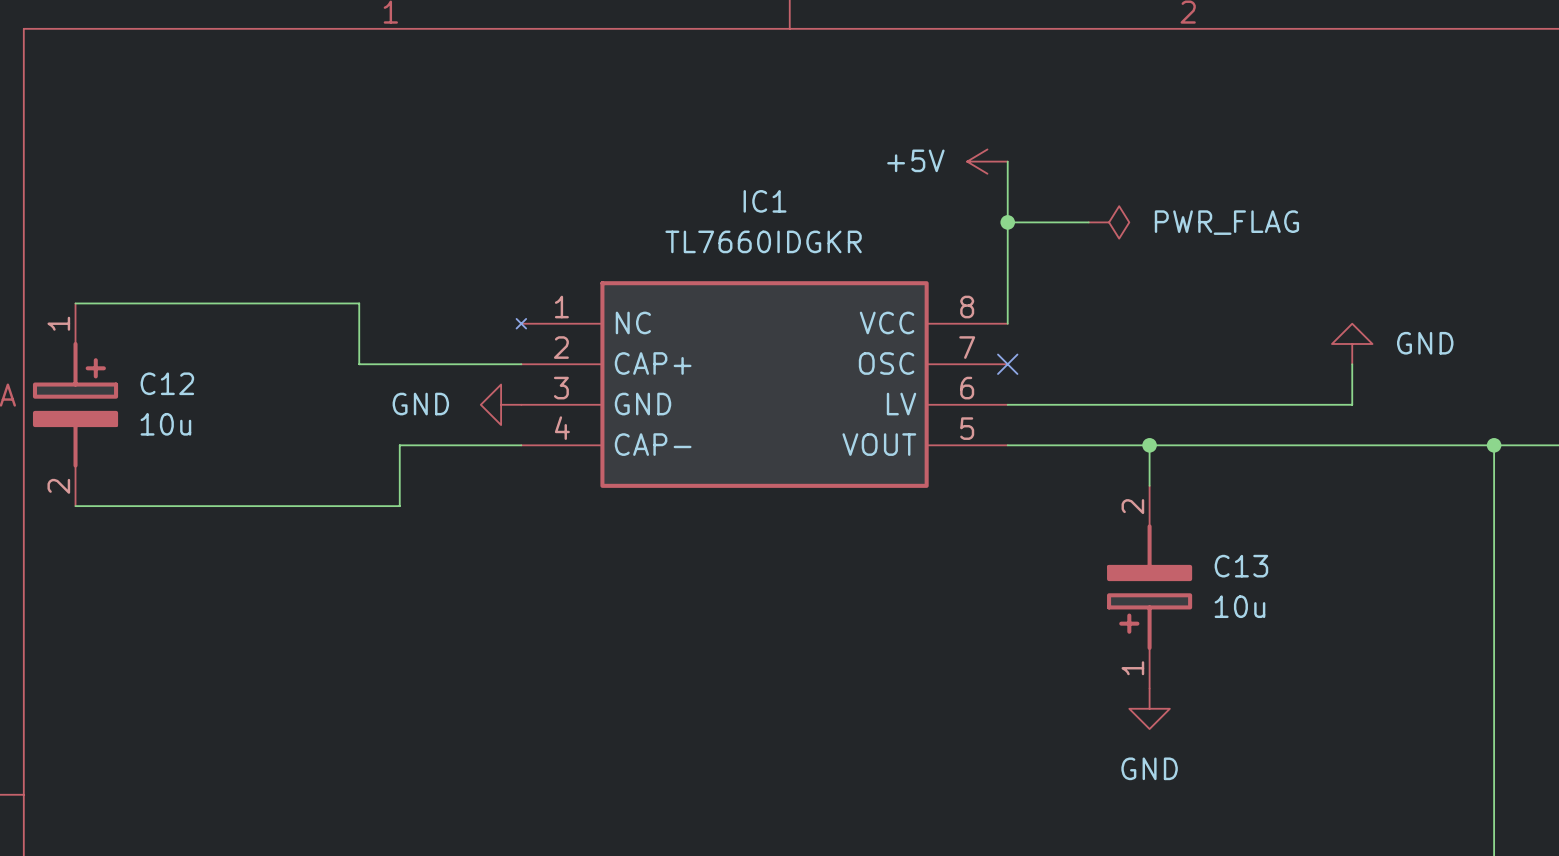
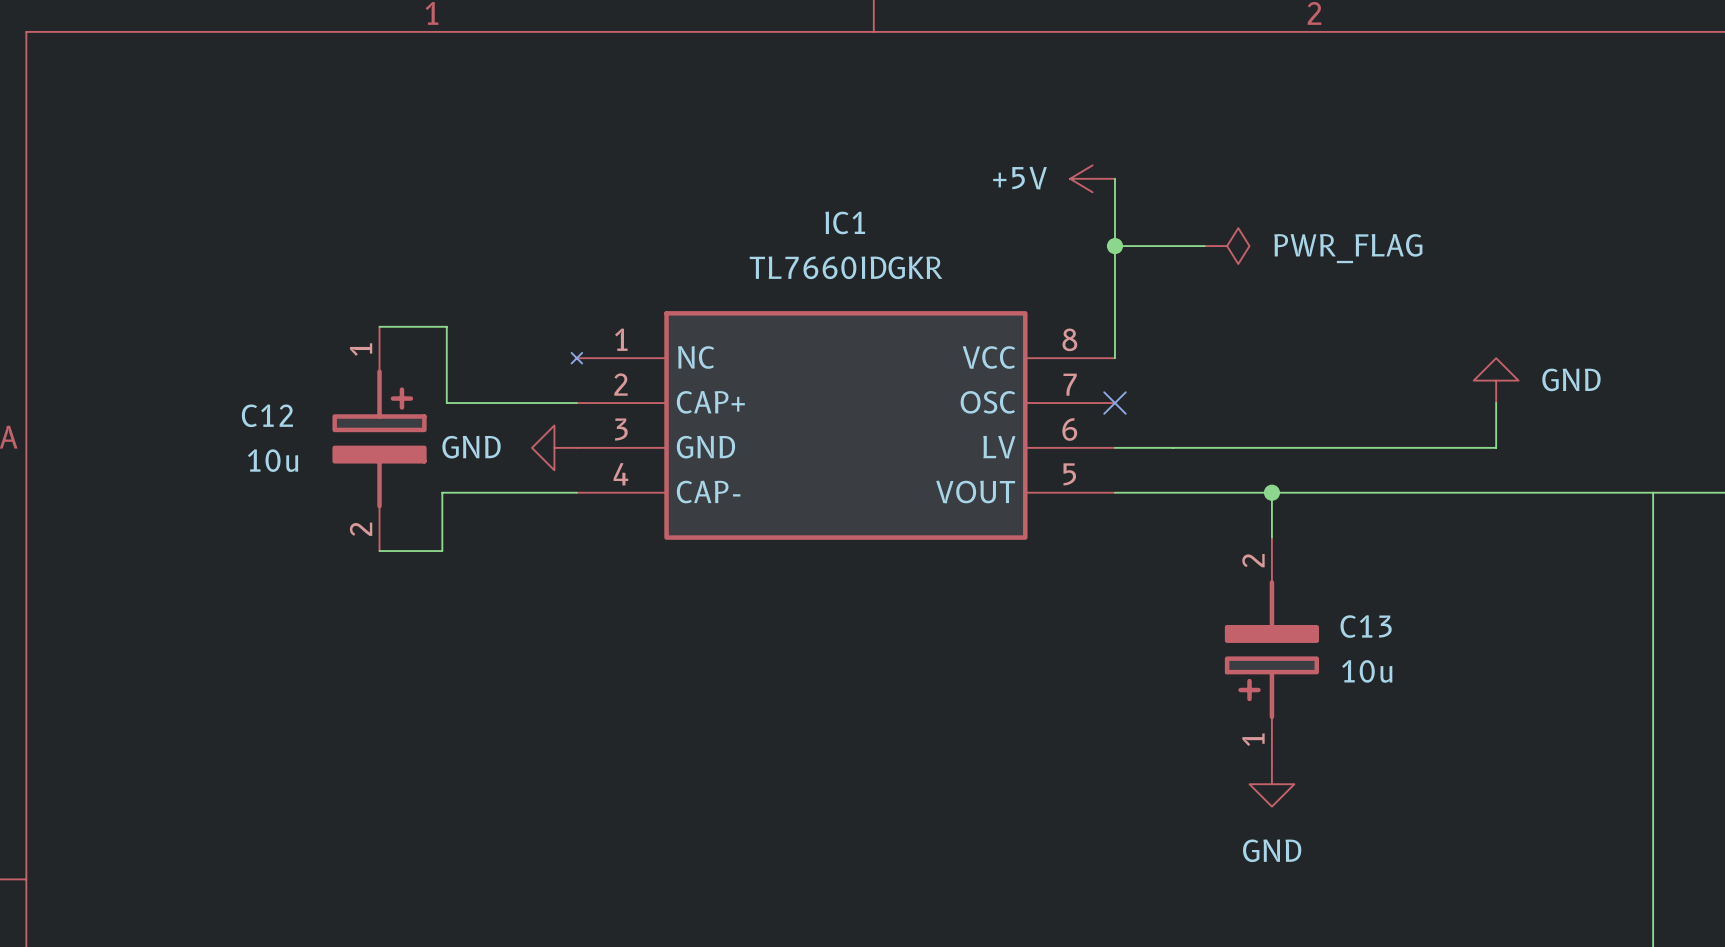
wire: (75, 303) (359, 303) (359, 364) (403, 364) -> (379, 326) (446, 326) (446, 403)
C12 name position: C12 (167, 383) -> C12 (267, 415)
C12 position: (75, 404) -> (379, 438)
C12 value position: 10u (165, 424) -> 10u (273, 460)
junction: (1494, 445) -> none
wire: (399, 498) (399, 506) (75, 506) -> (442, 551) (379, 551)

